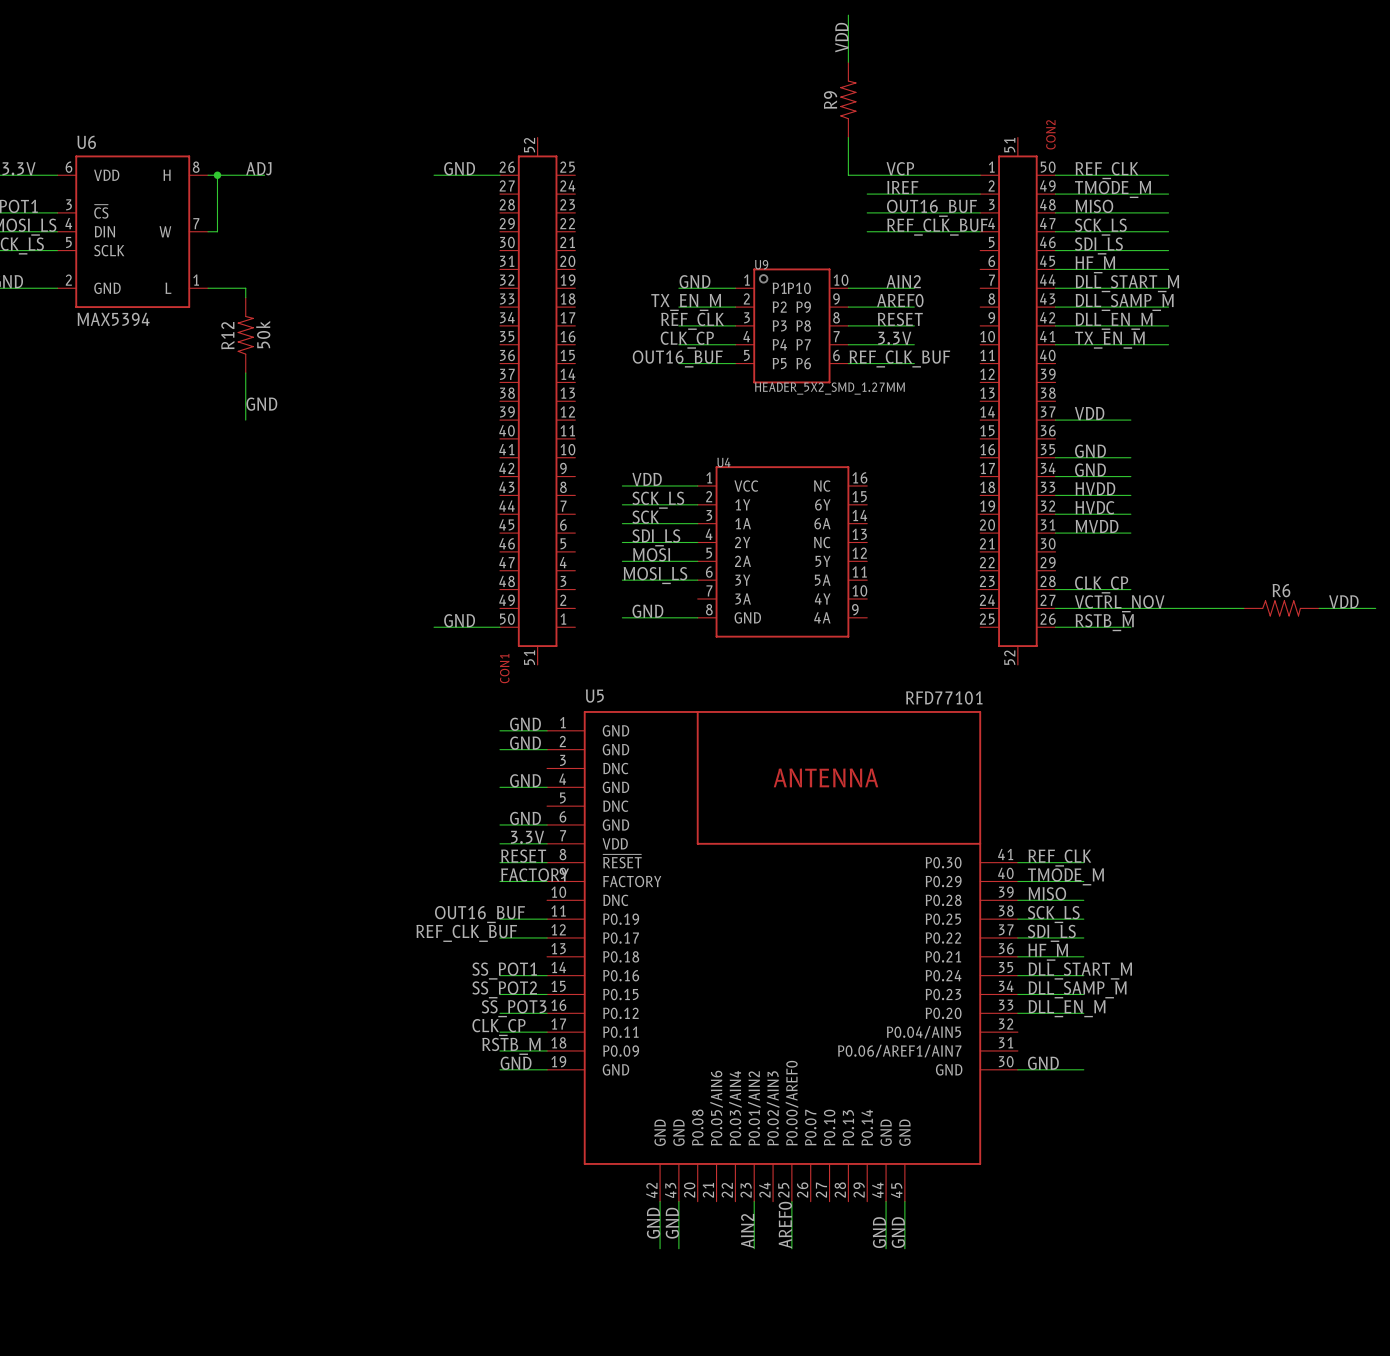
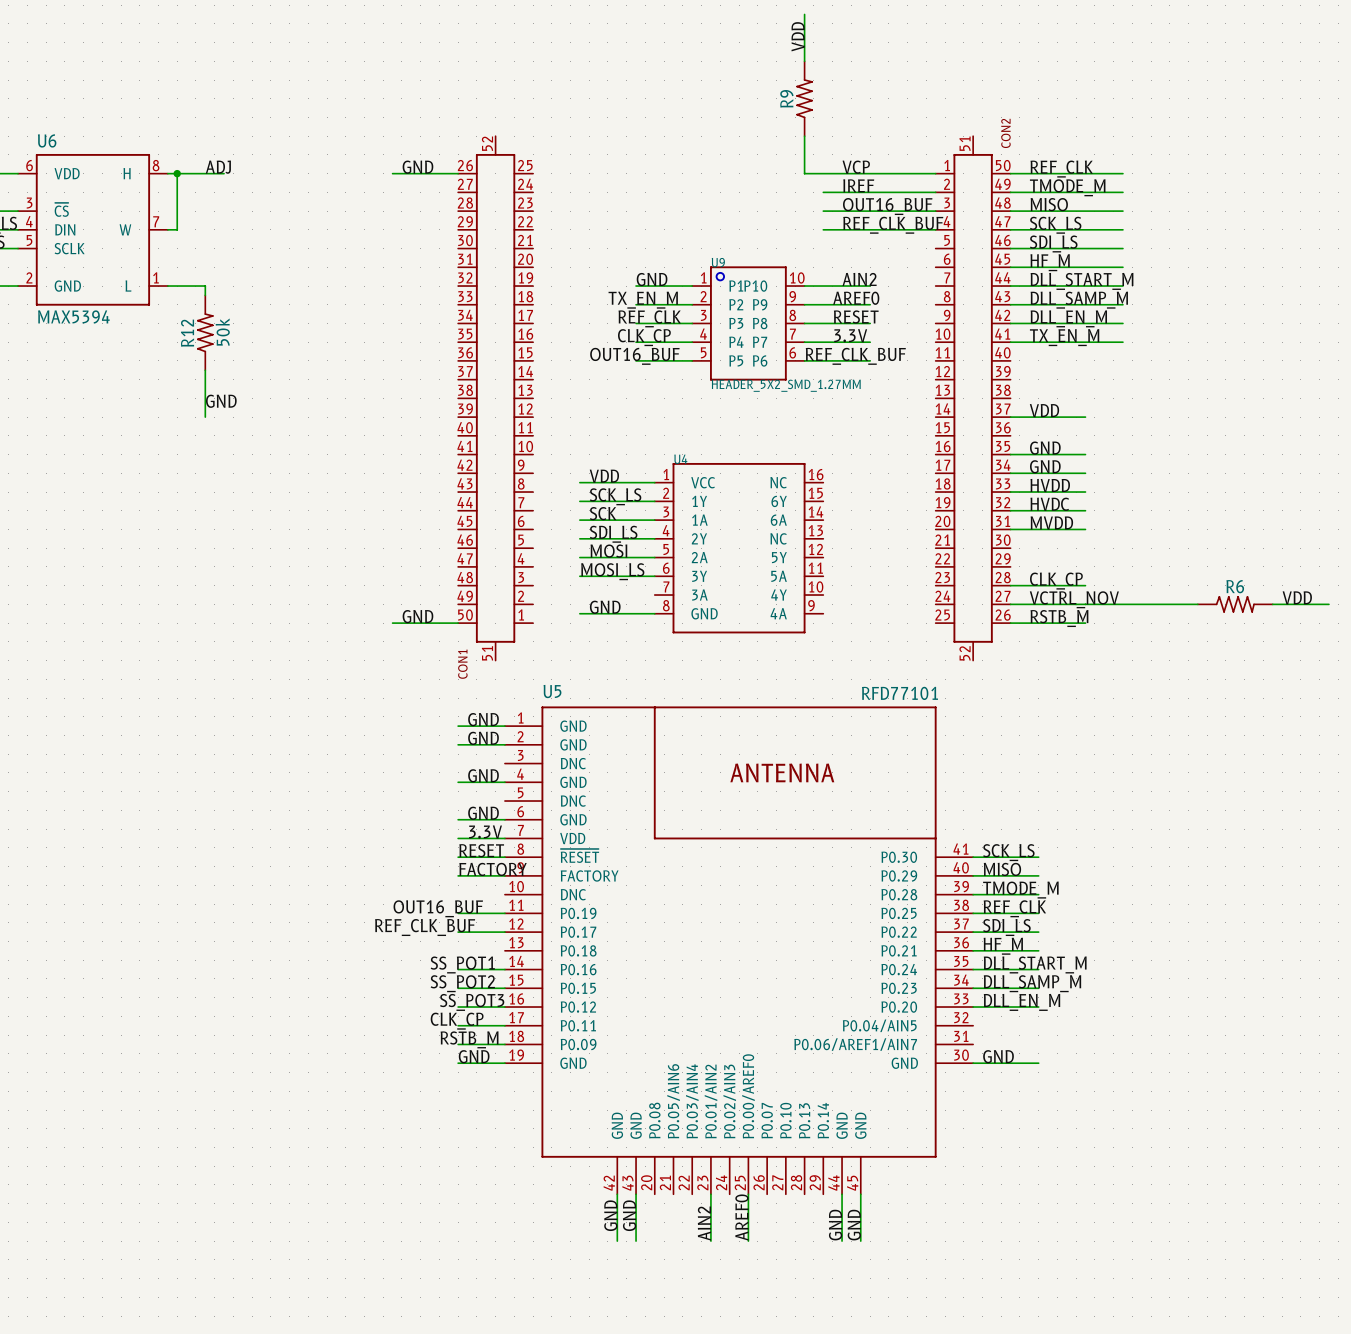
label: REF_CLK (1059, 858) -> SCK_LS (1008, 852)
label: TMODE_M (1065, 876) -> MISO (1002, 869)
label: MISO (1047, 893) -> TMODE_M (1020, 890)
label: SCK_LS (1053, 914) -> REF_CLK (1014, 908)

